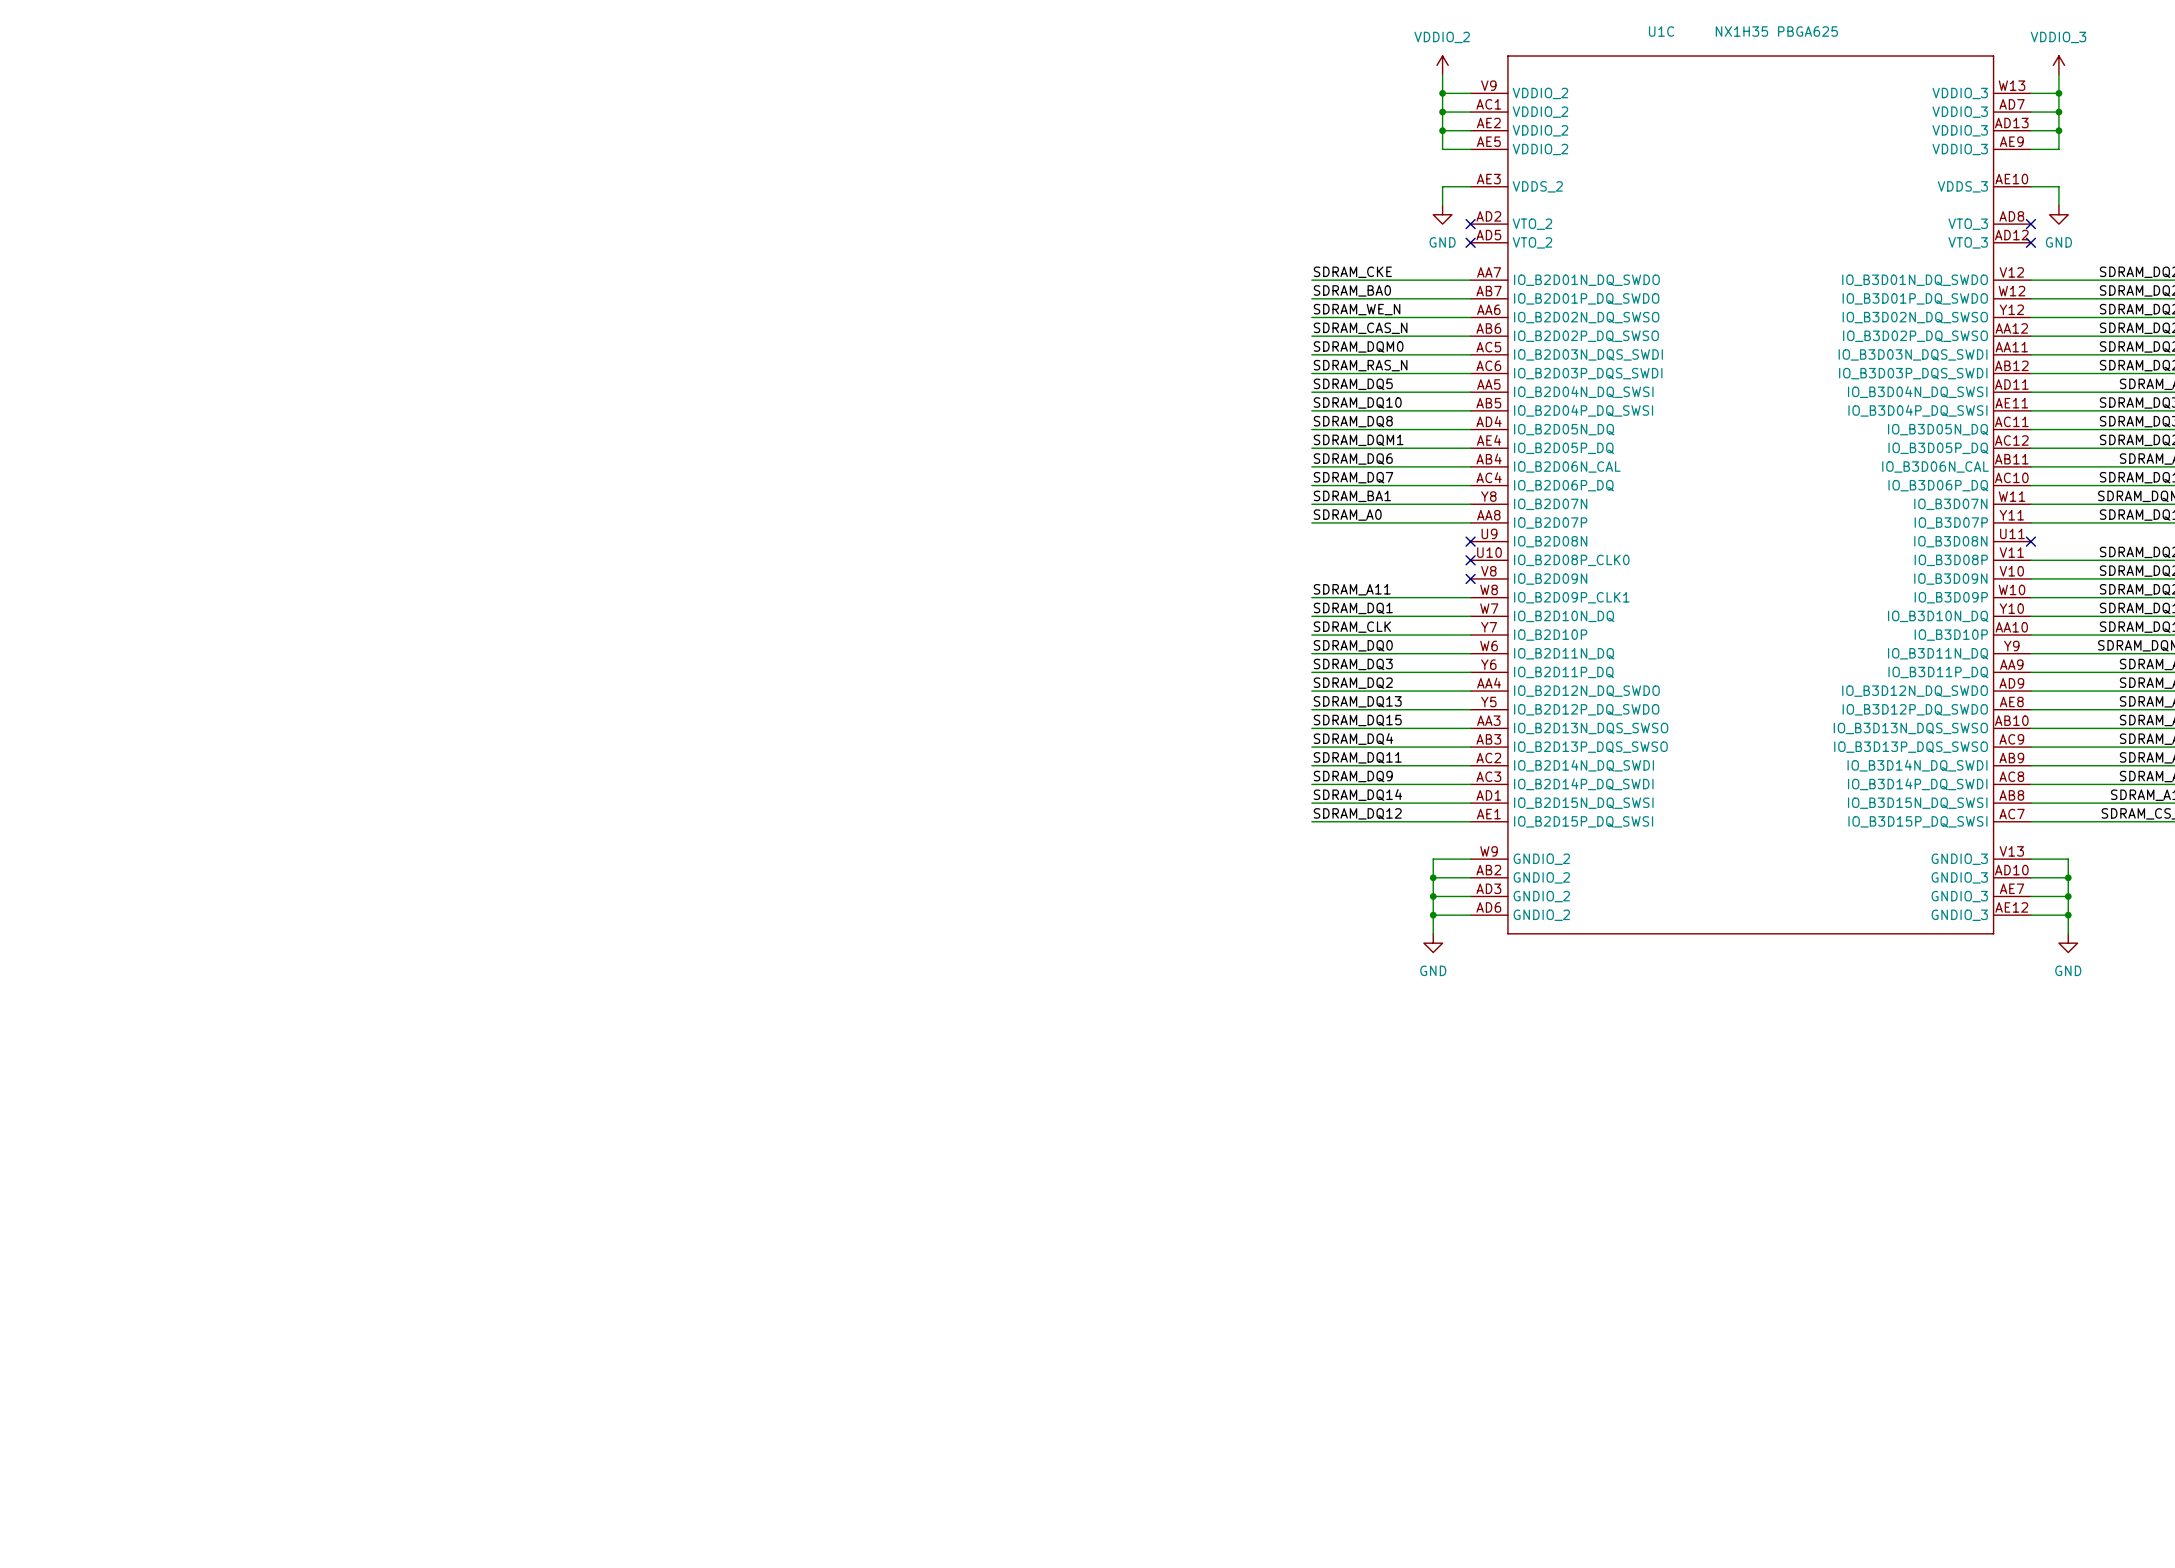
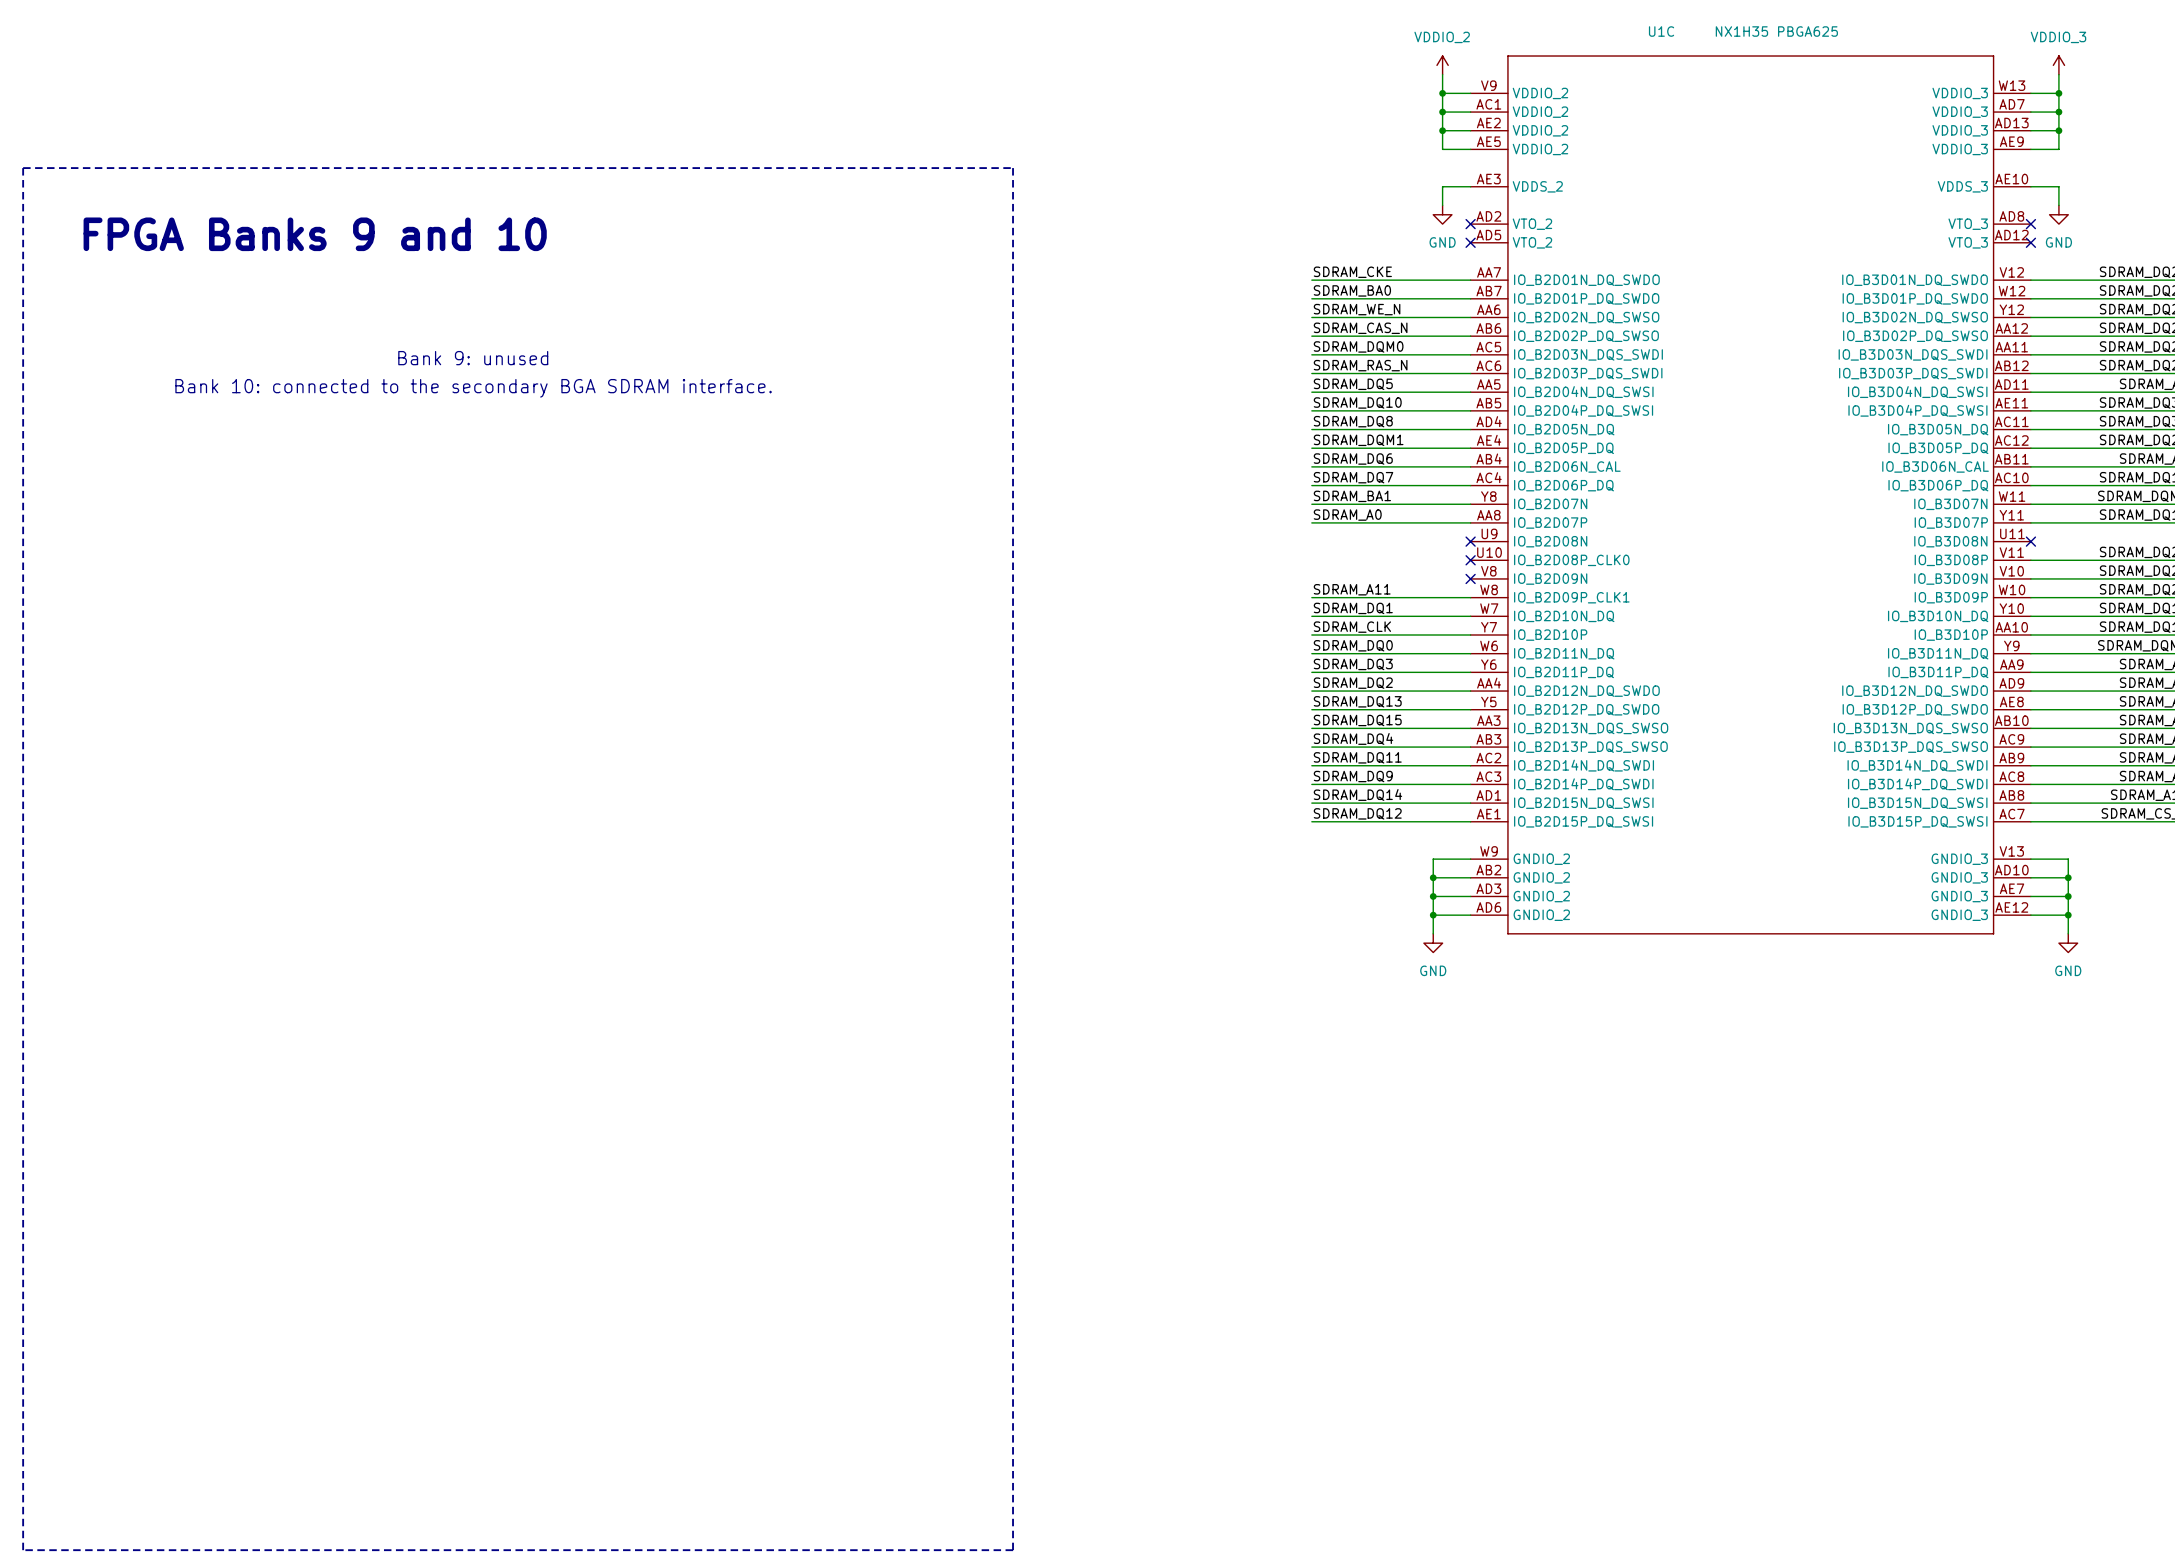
line: none -> (23, 168) (1013, 168) (1013, 1550) (23, 1550) (23, 168)
text: none -> FPGA Banks 9 and 10 (315, 234)
text: none -> Bank 9: unused (473, 358)
text: none -> Bank 10: connected to the secondary BGA SDRAM interface. (473, 388)

